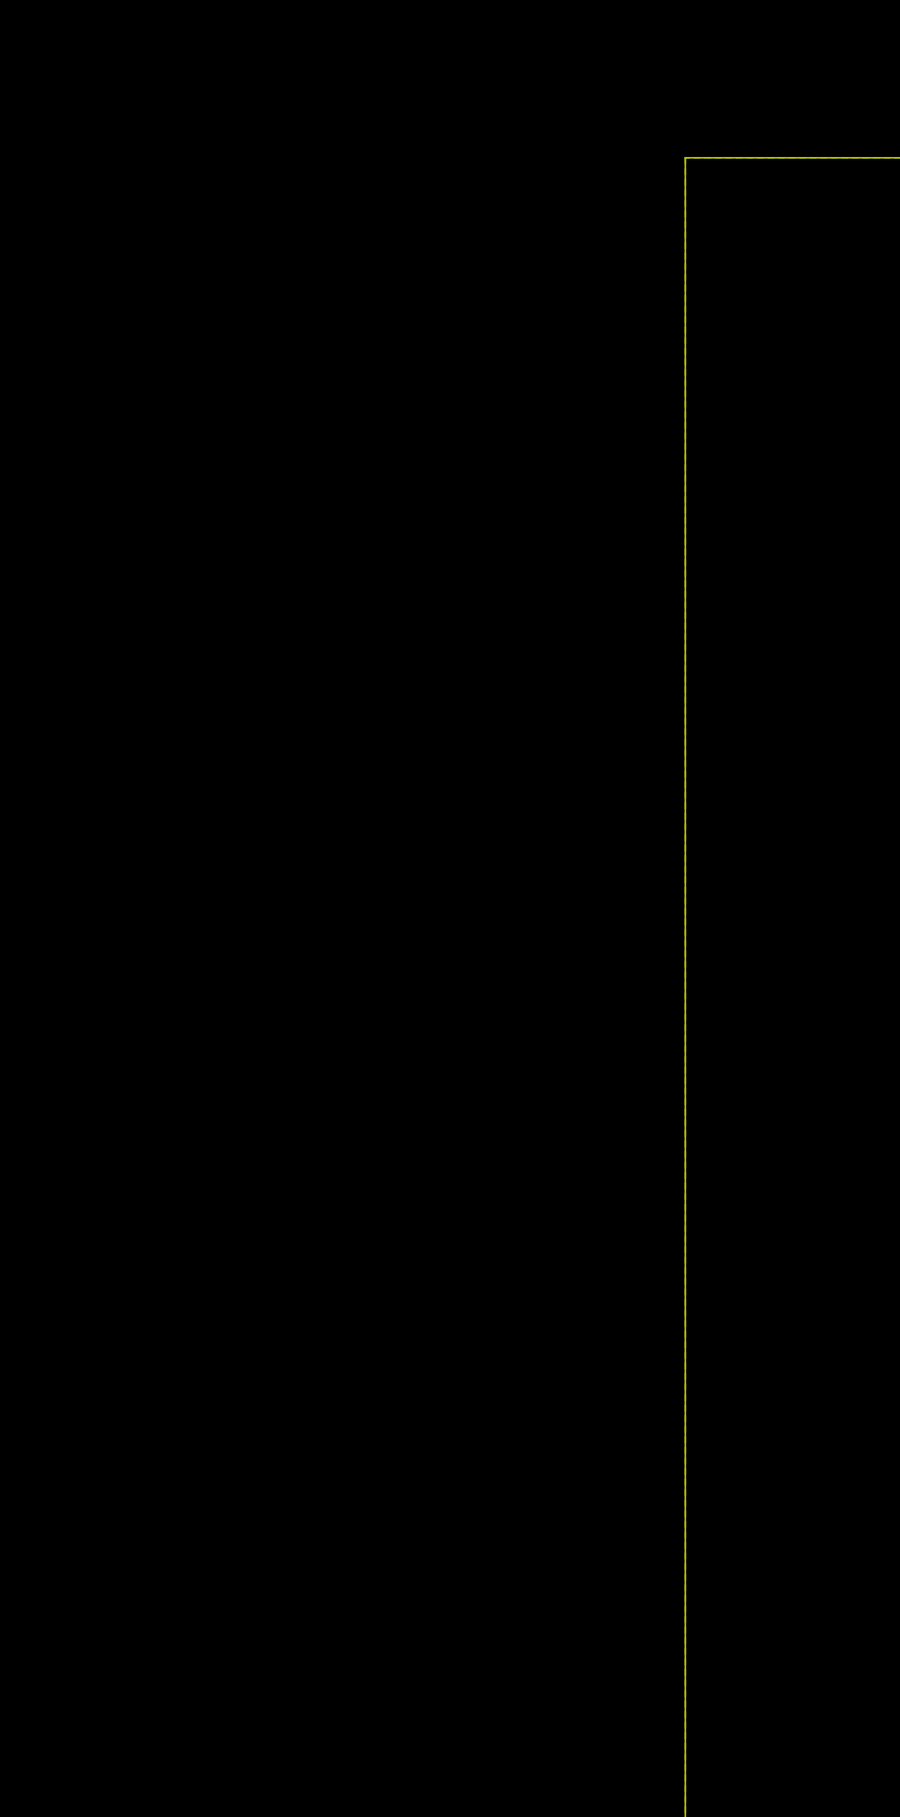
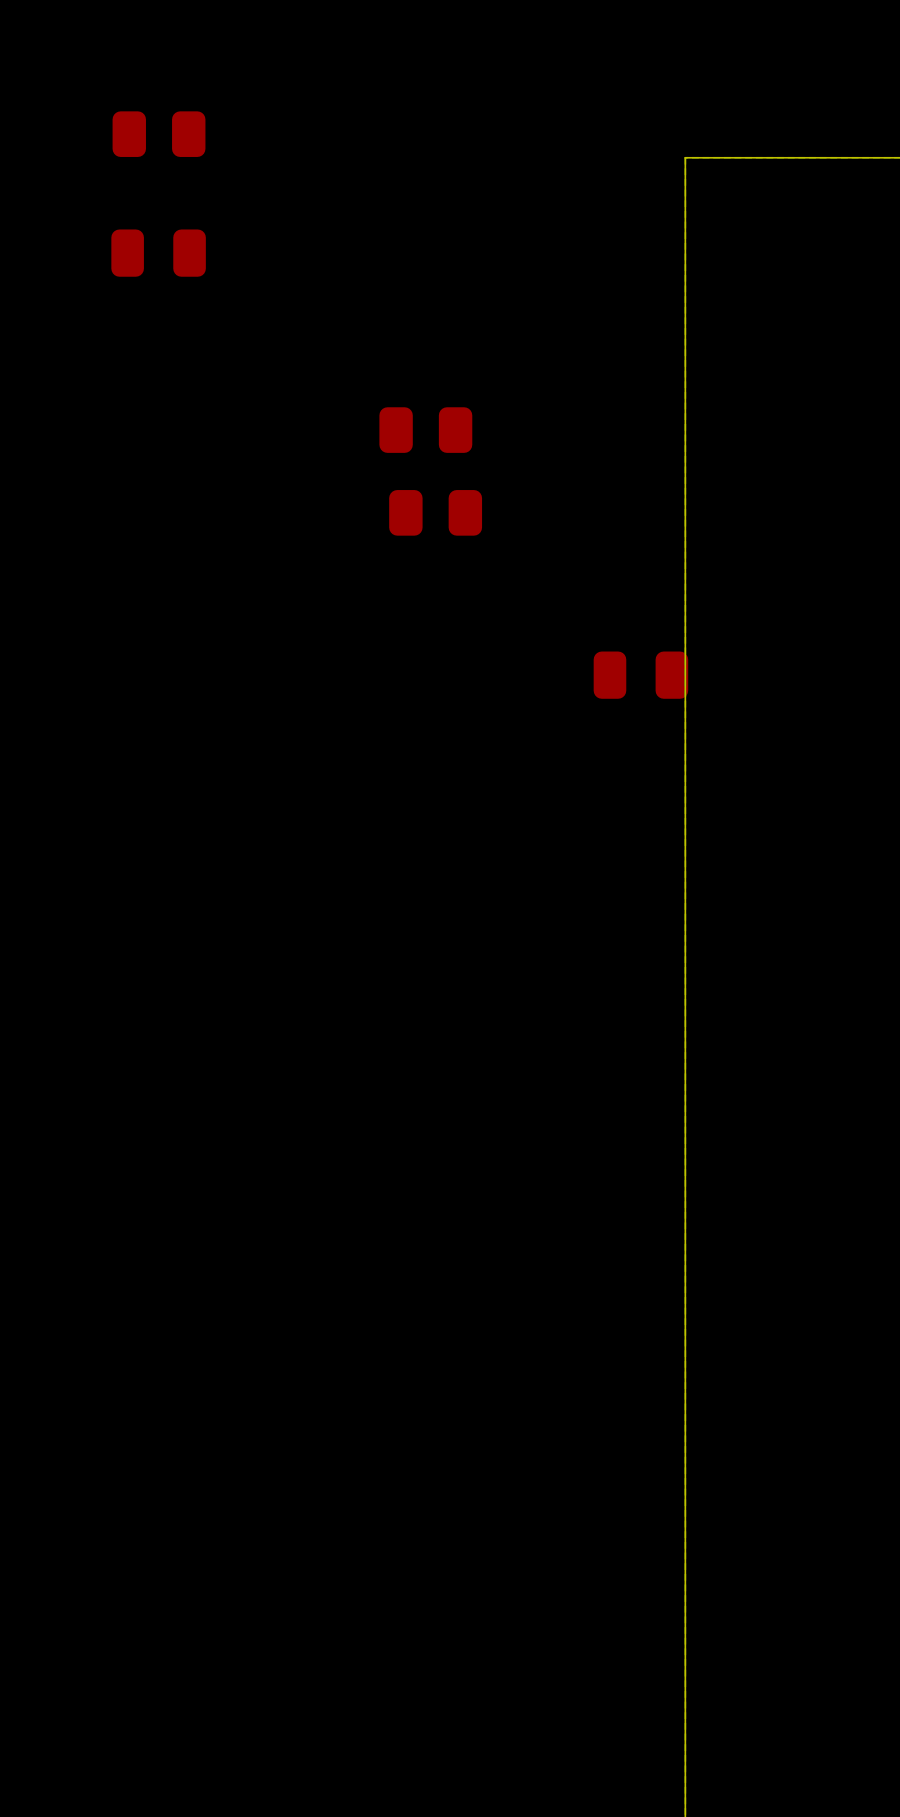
part: none -> (159, 134)
part: none -> (158, 253)
part: none -> (425, 430)
part: none -> (435, 512)
part: none -> (640, 675)

